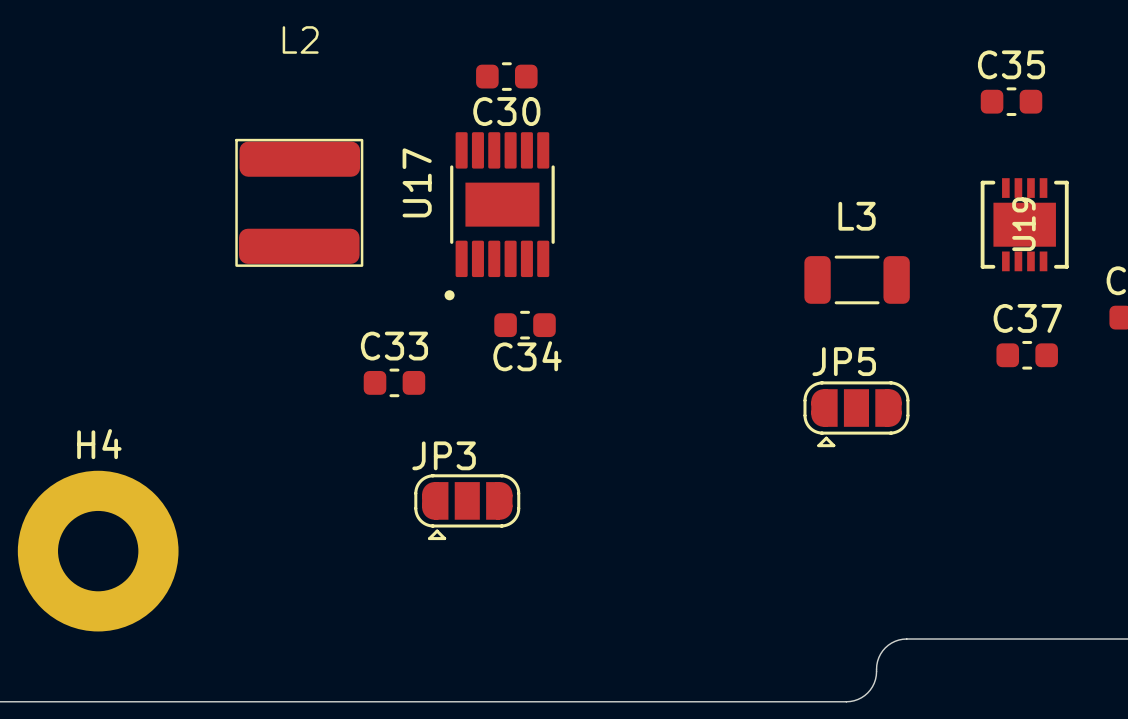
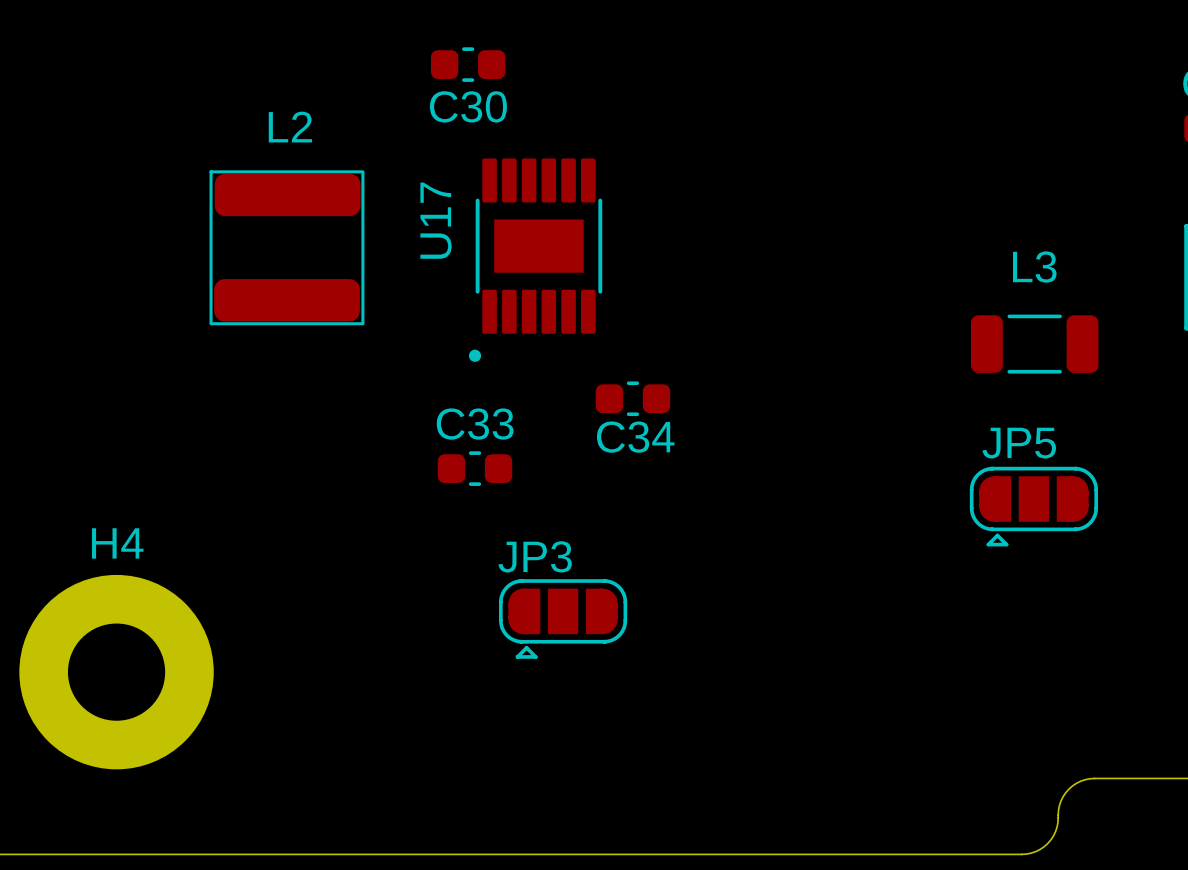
L2 name position: L2 (300, 39) -> L2 (290, 127)
C30 position: (506, 76) -> (468, 64)
L2 position: (299, 202) -> (286, 247)
U17 position: (499, 216) -> (535, 260)

